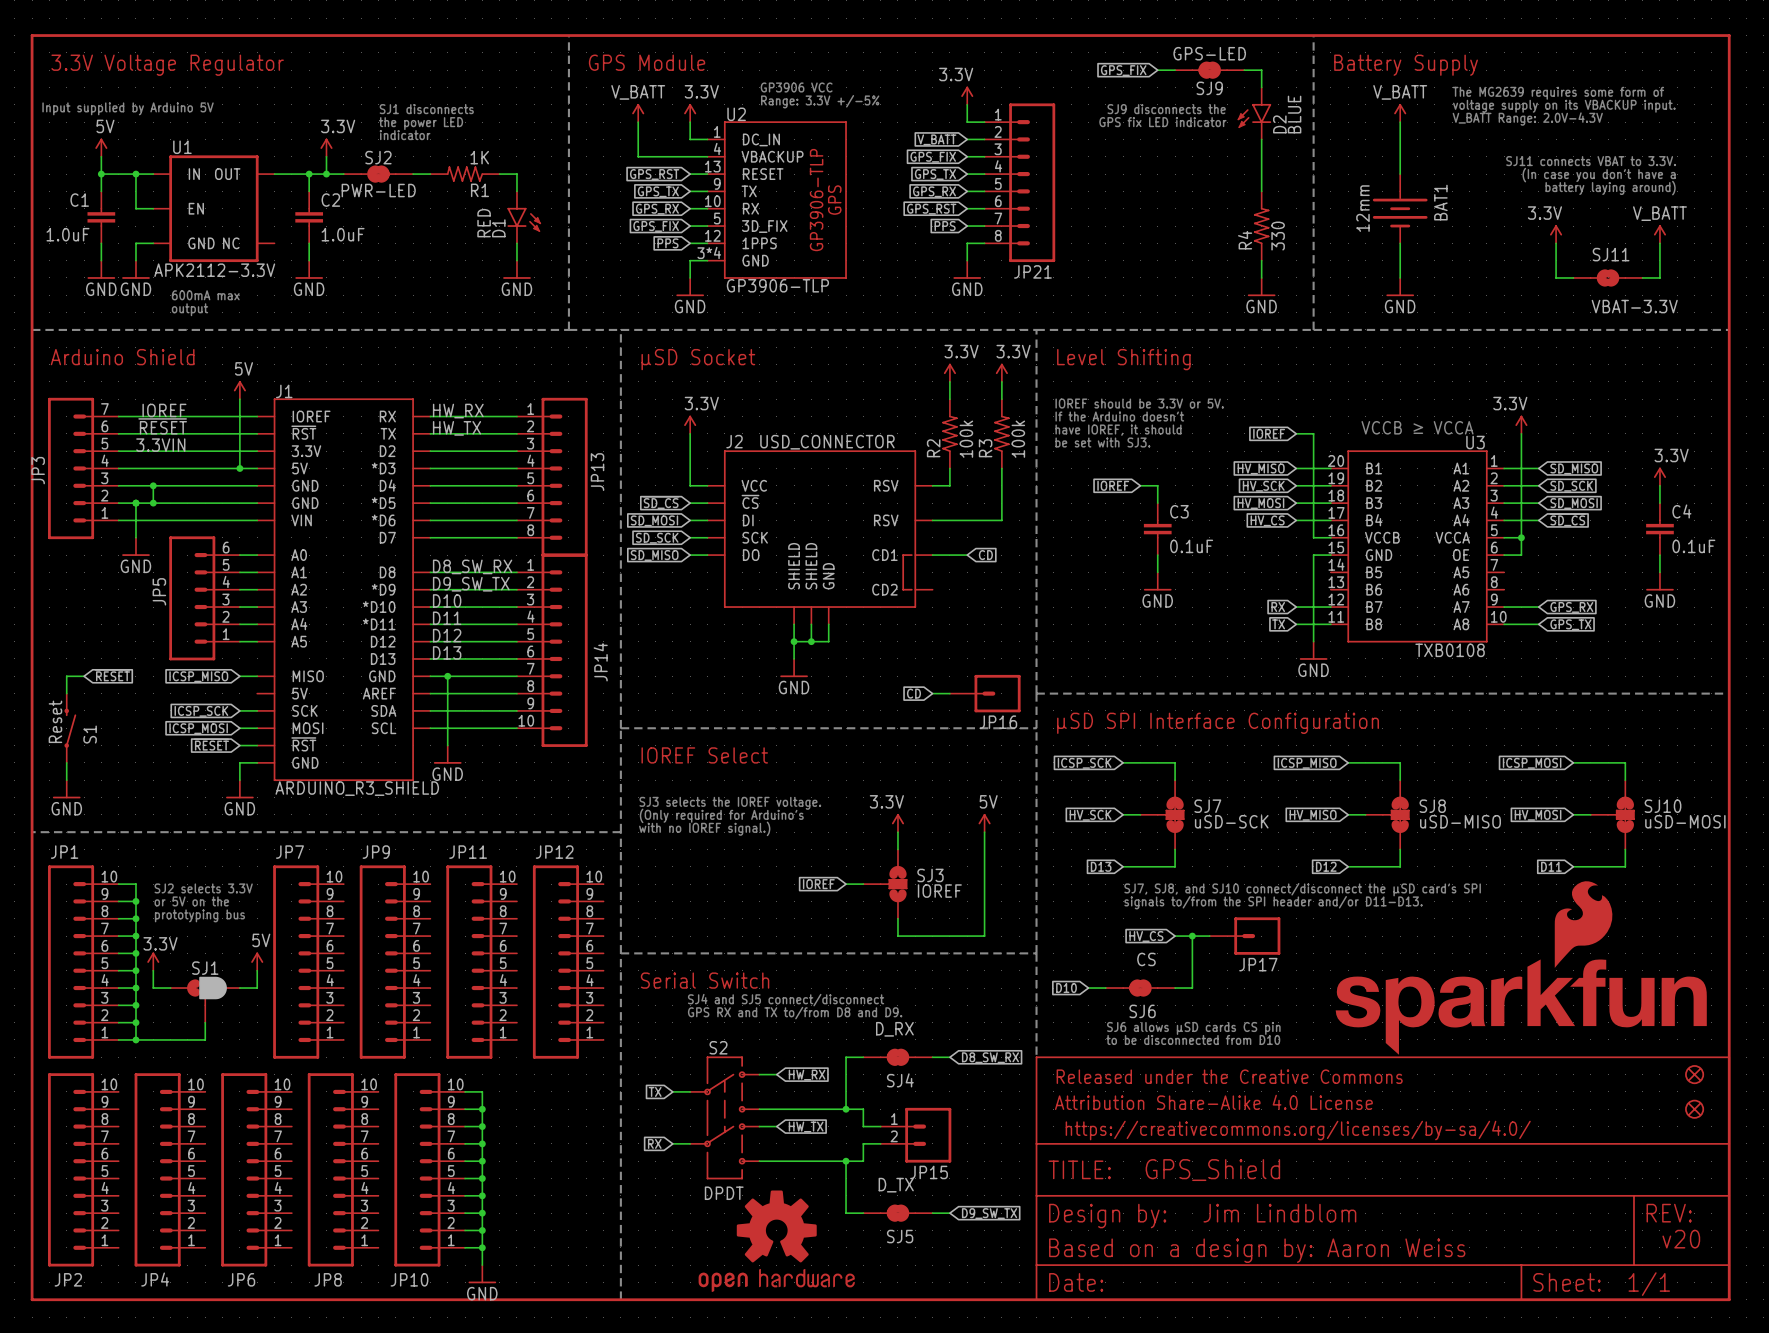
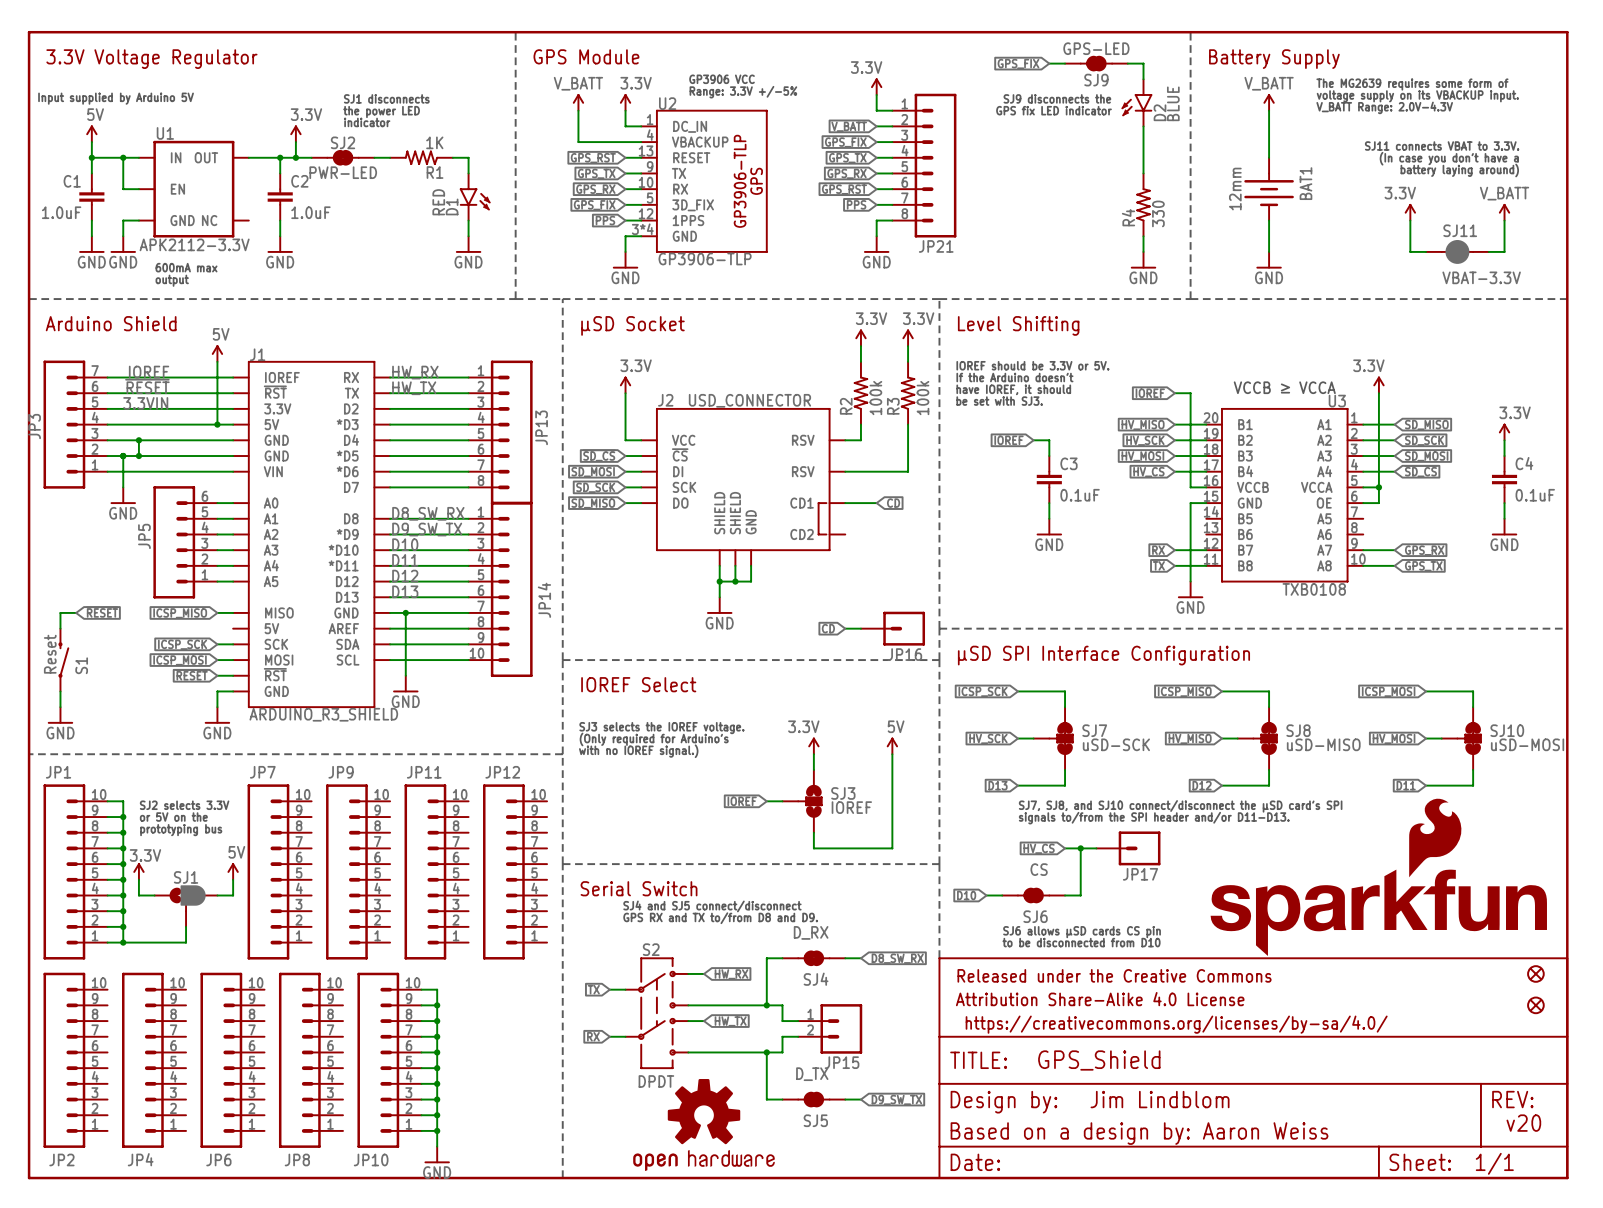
SJ11 symbol: [1573, 269, 1643, 287] -> [1426, 240, 1489, 264]

